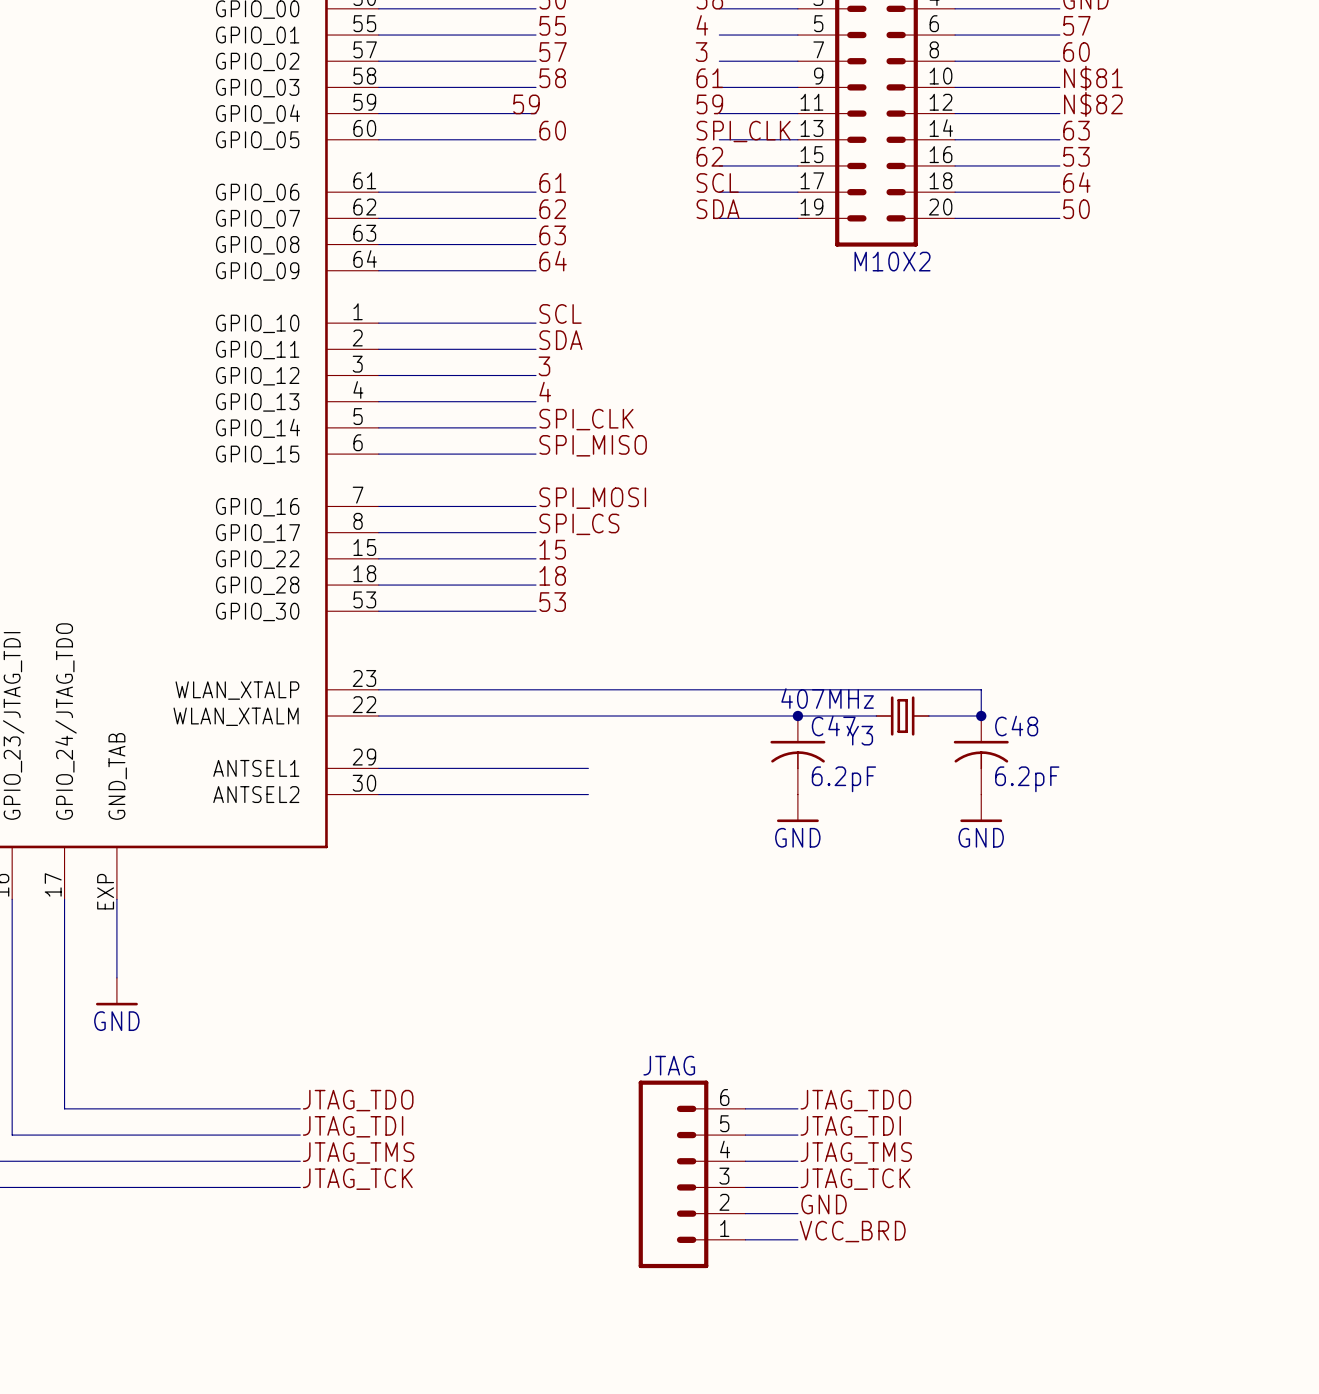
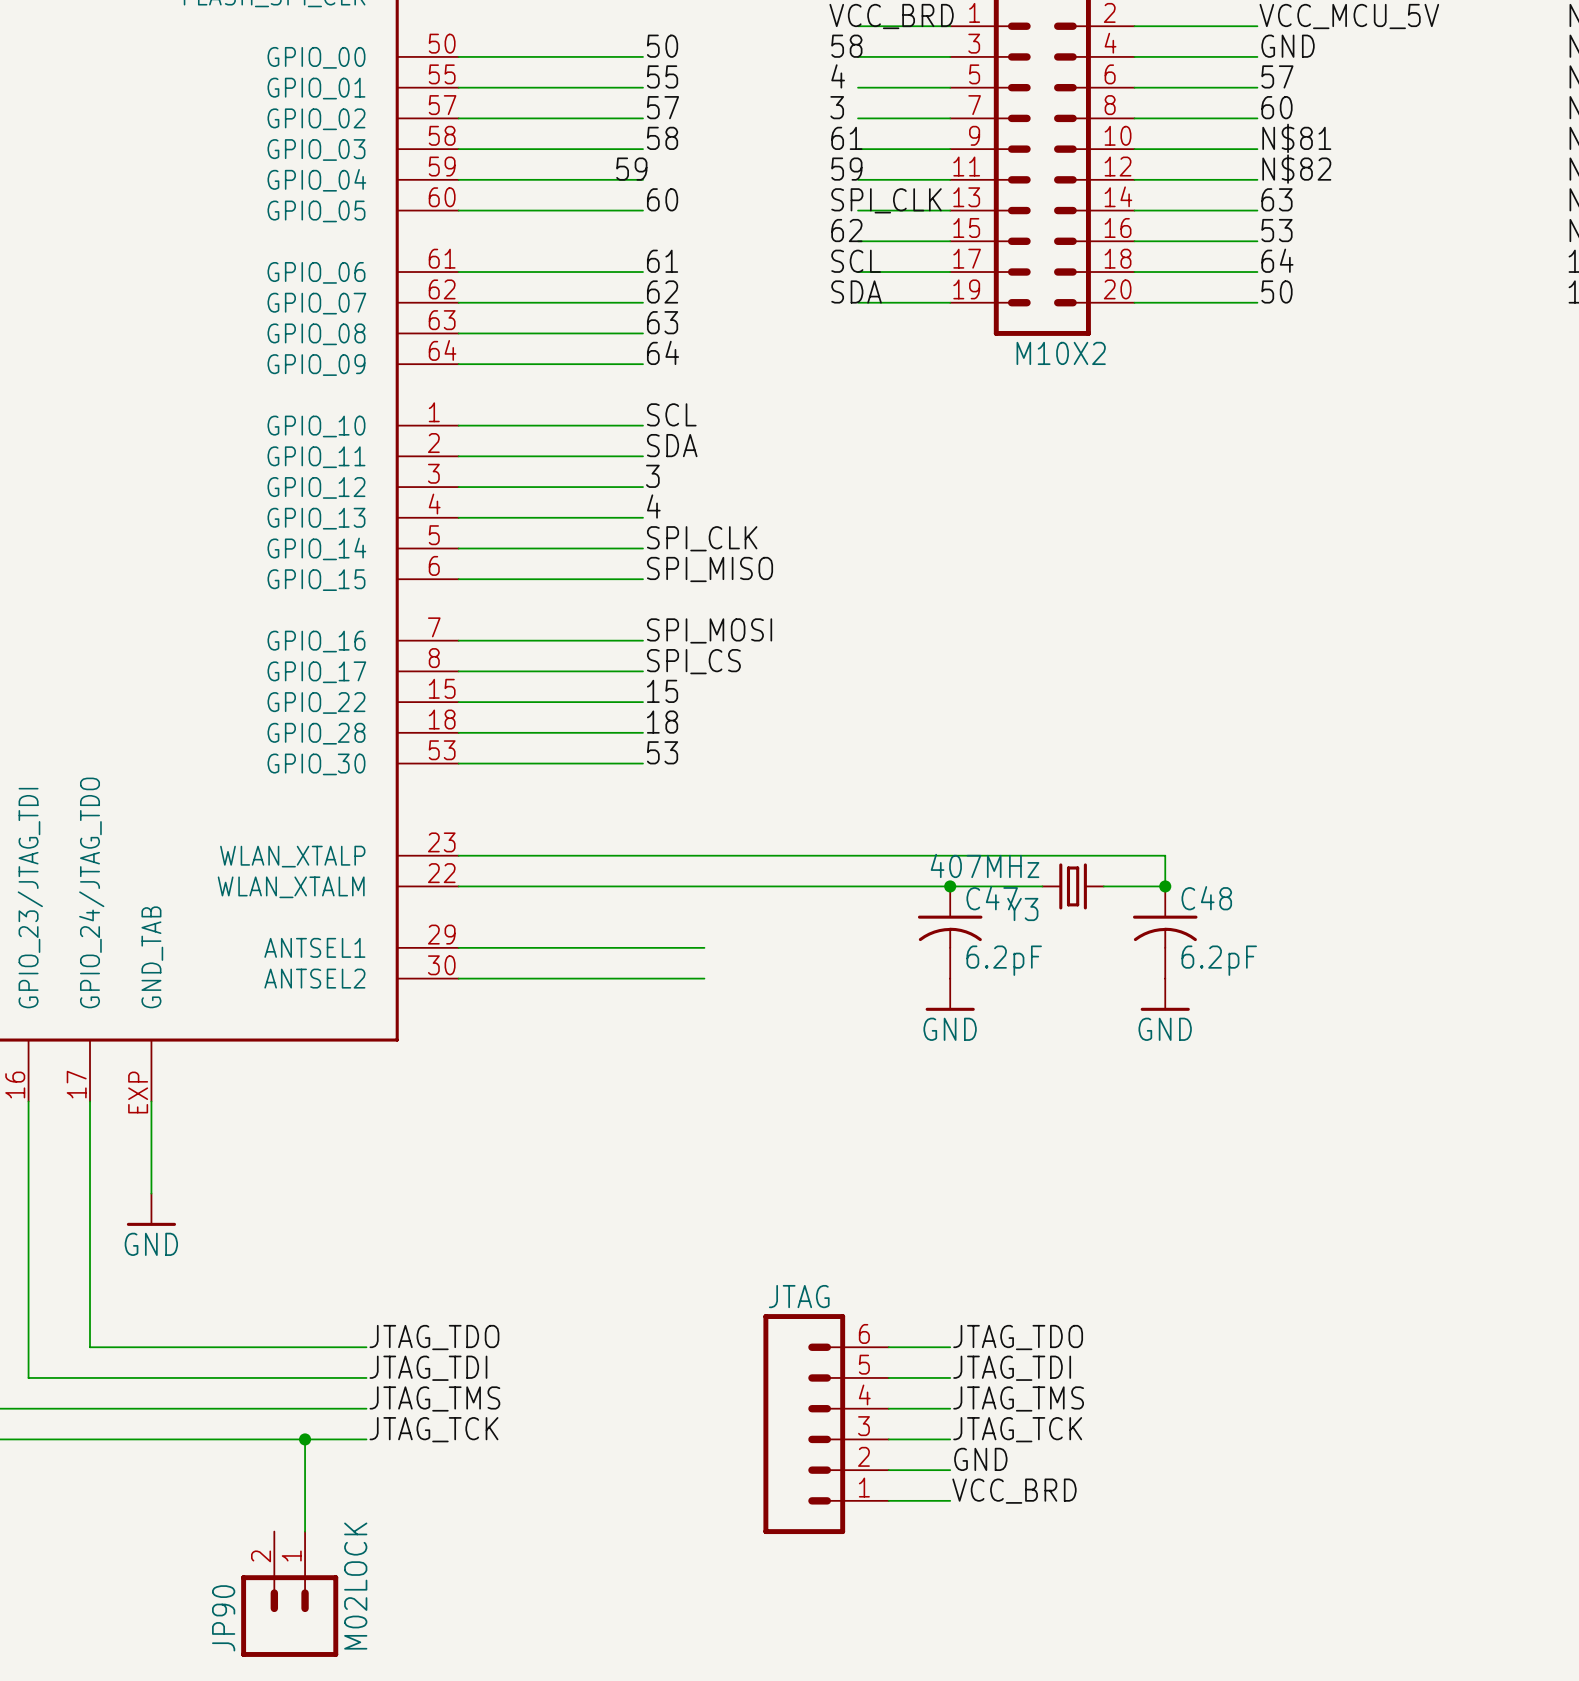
wire: none -> (305, 1439) (305, 1531)
junction: none -> (305, 1439)
JP90: none -> M02LOCK (289, 1594)

